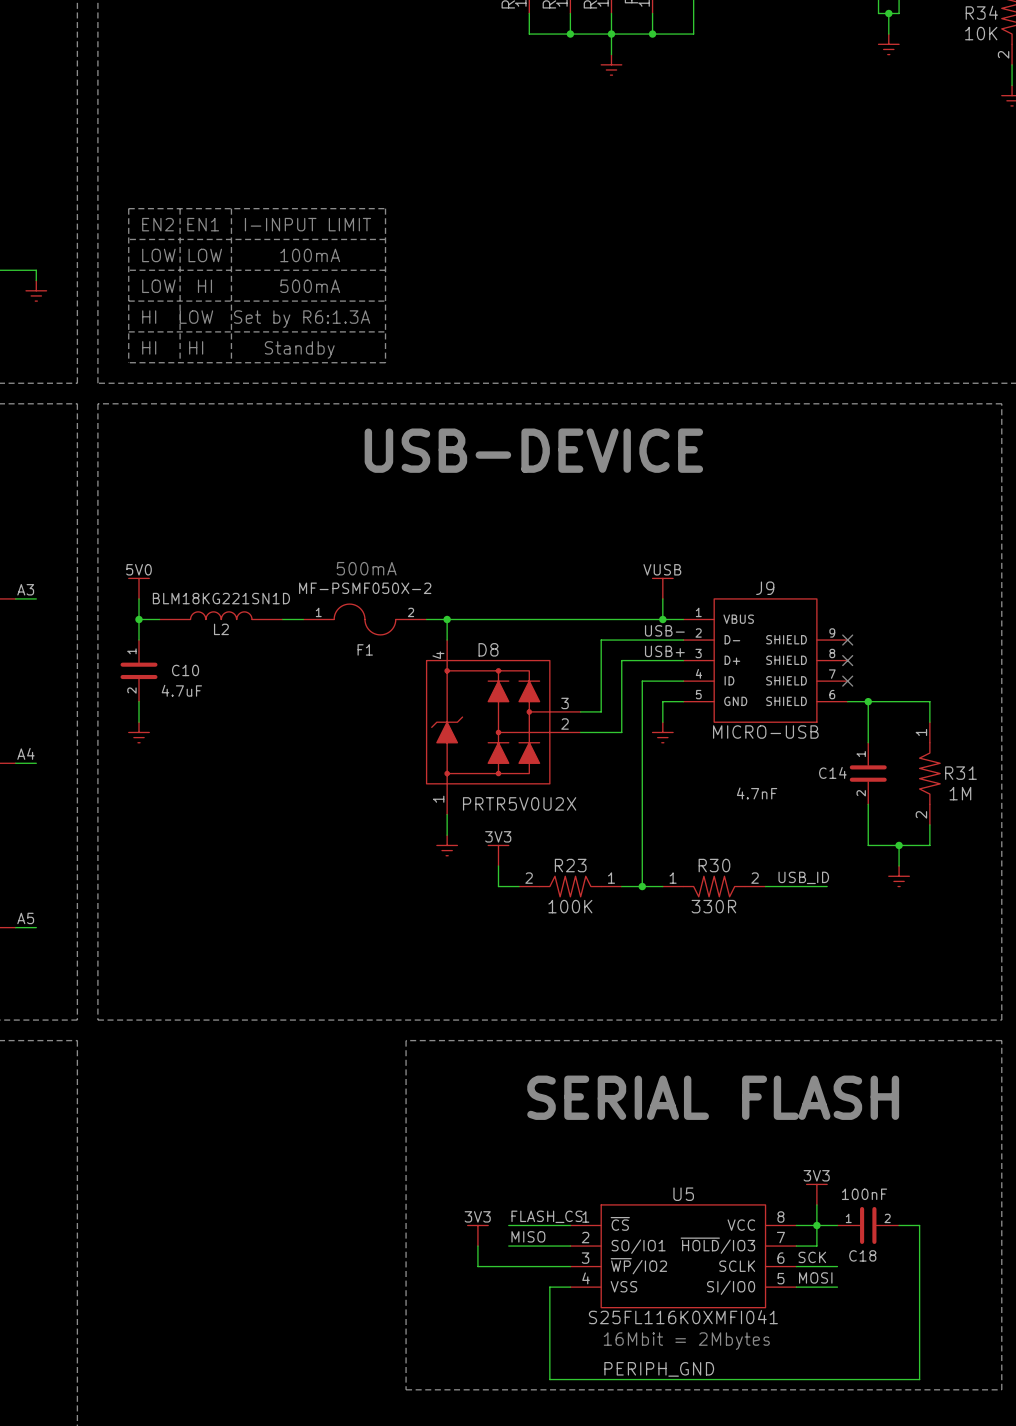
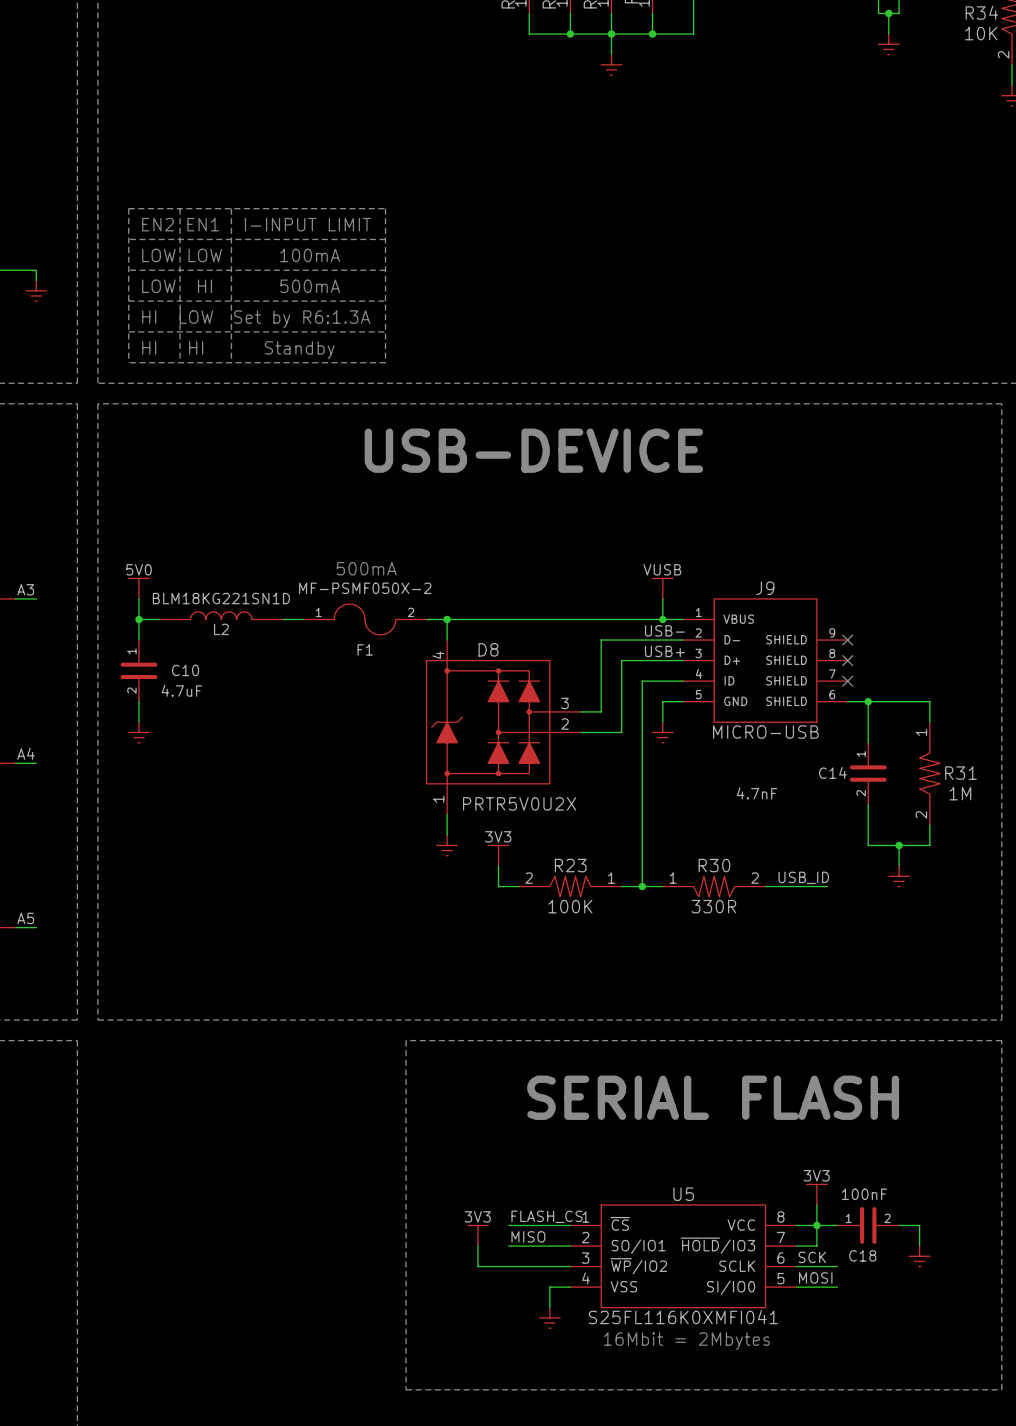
wire: (919, 1246) (919, 1379) (549, 1379) (549, 1307) -> none
power symbol: none -> (919, 1256)
power symbol: none -> (549, 1317)
label: PERIPH_GND (659, 1369) -> none

